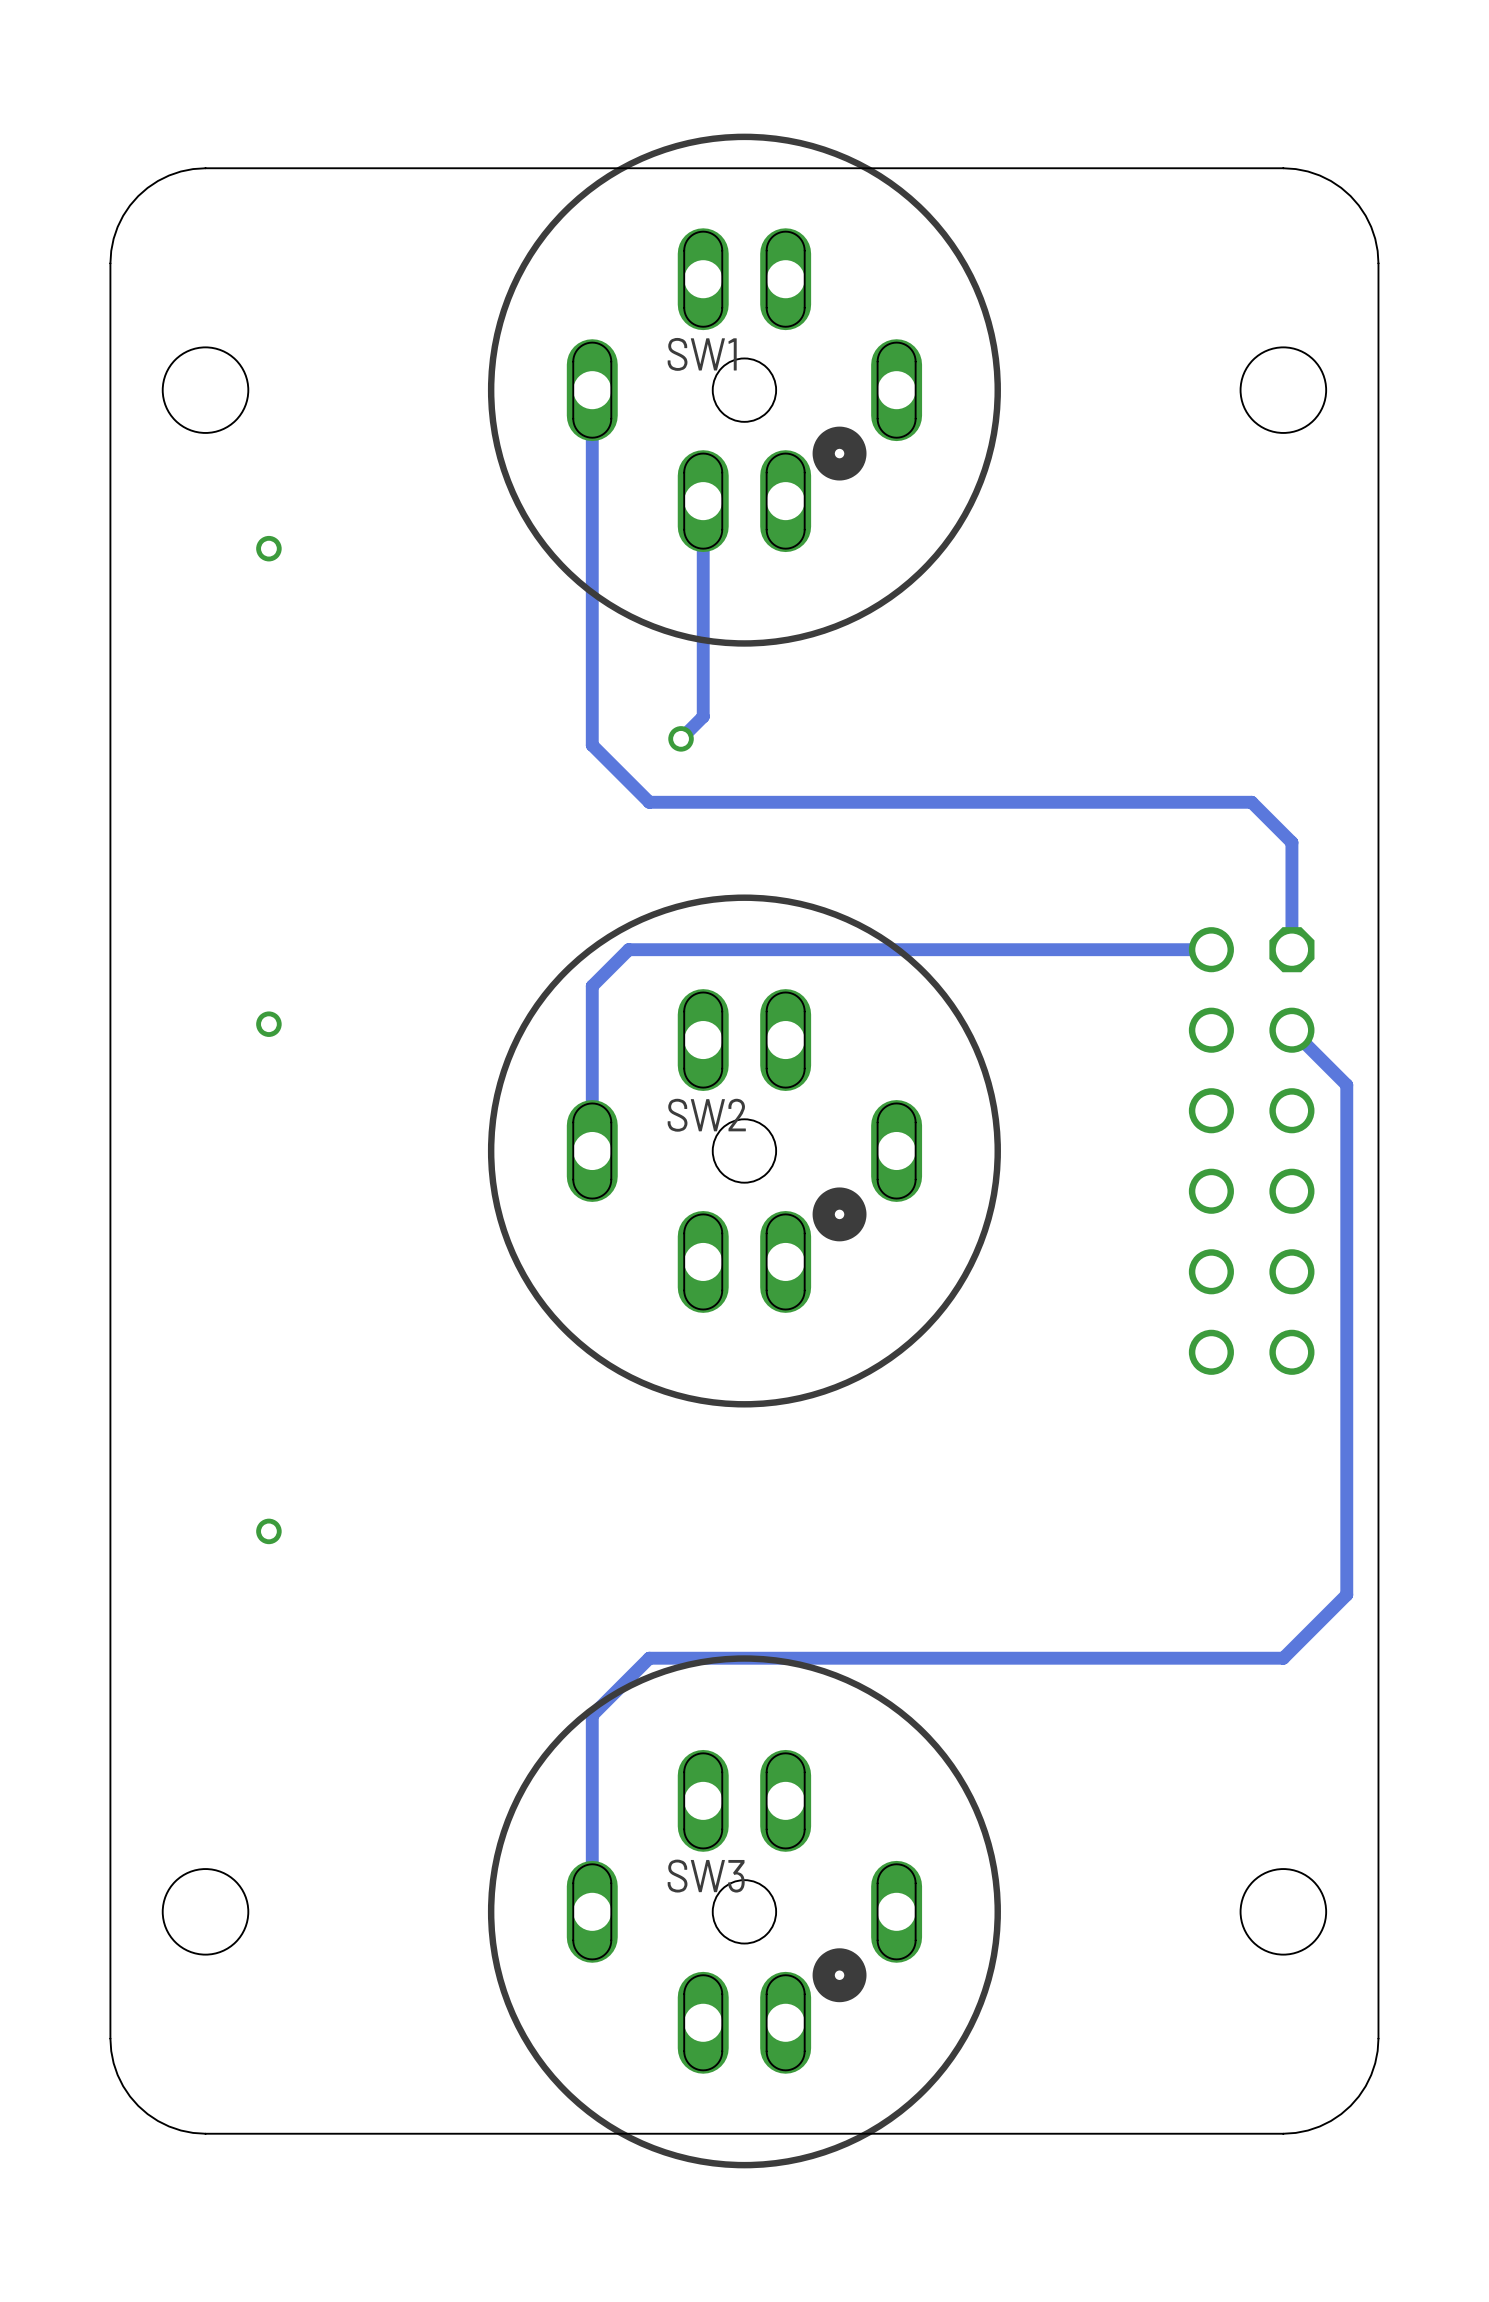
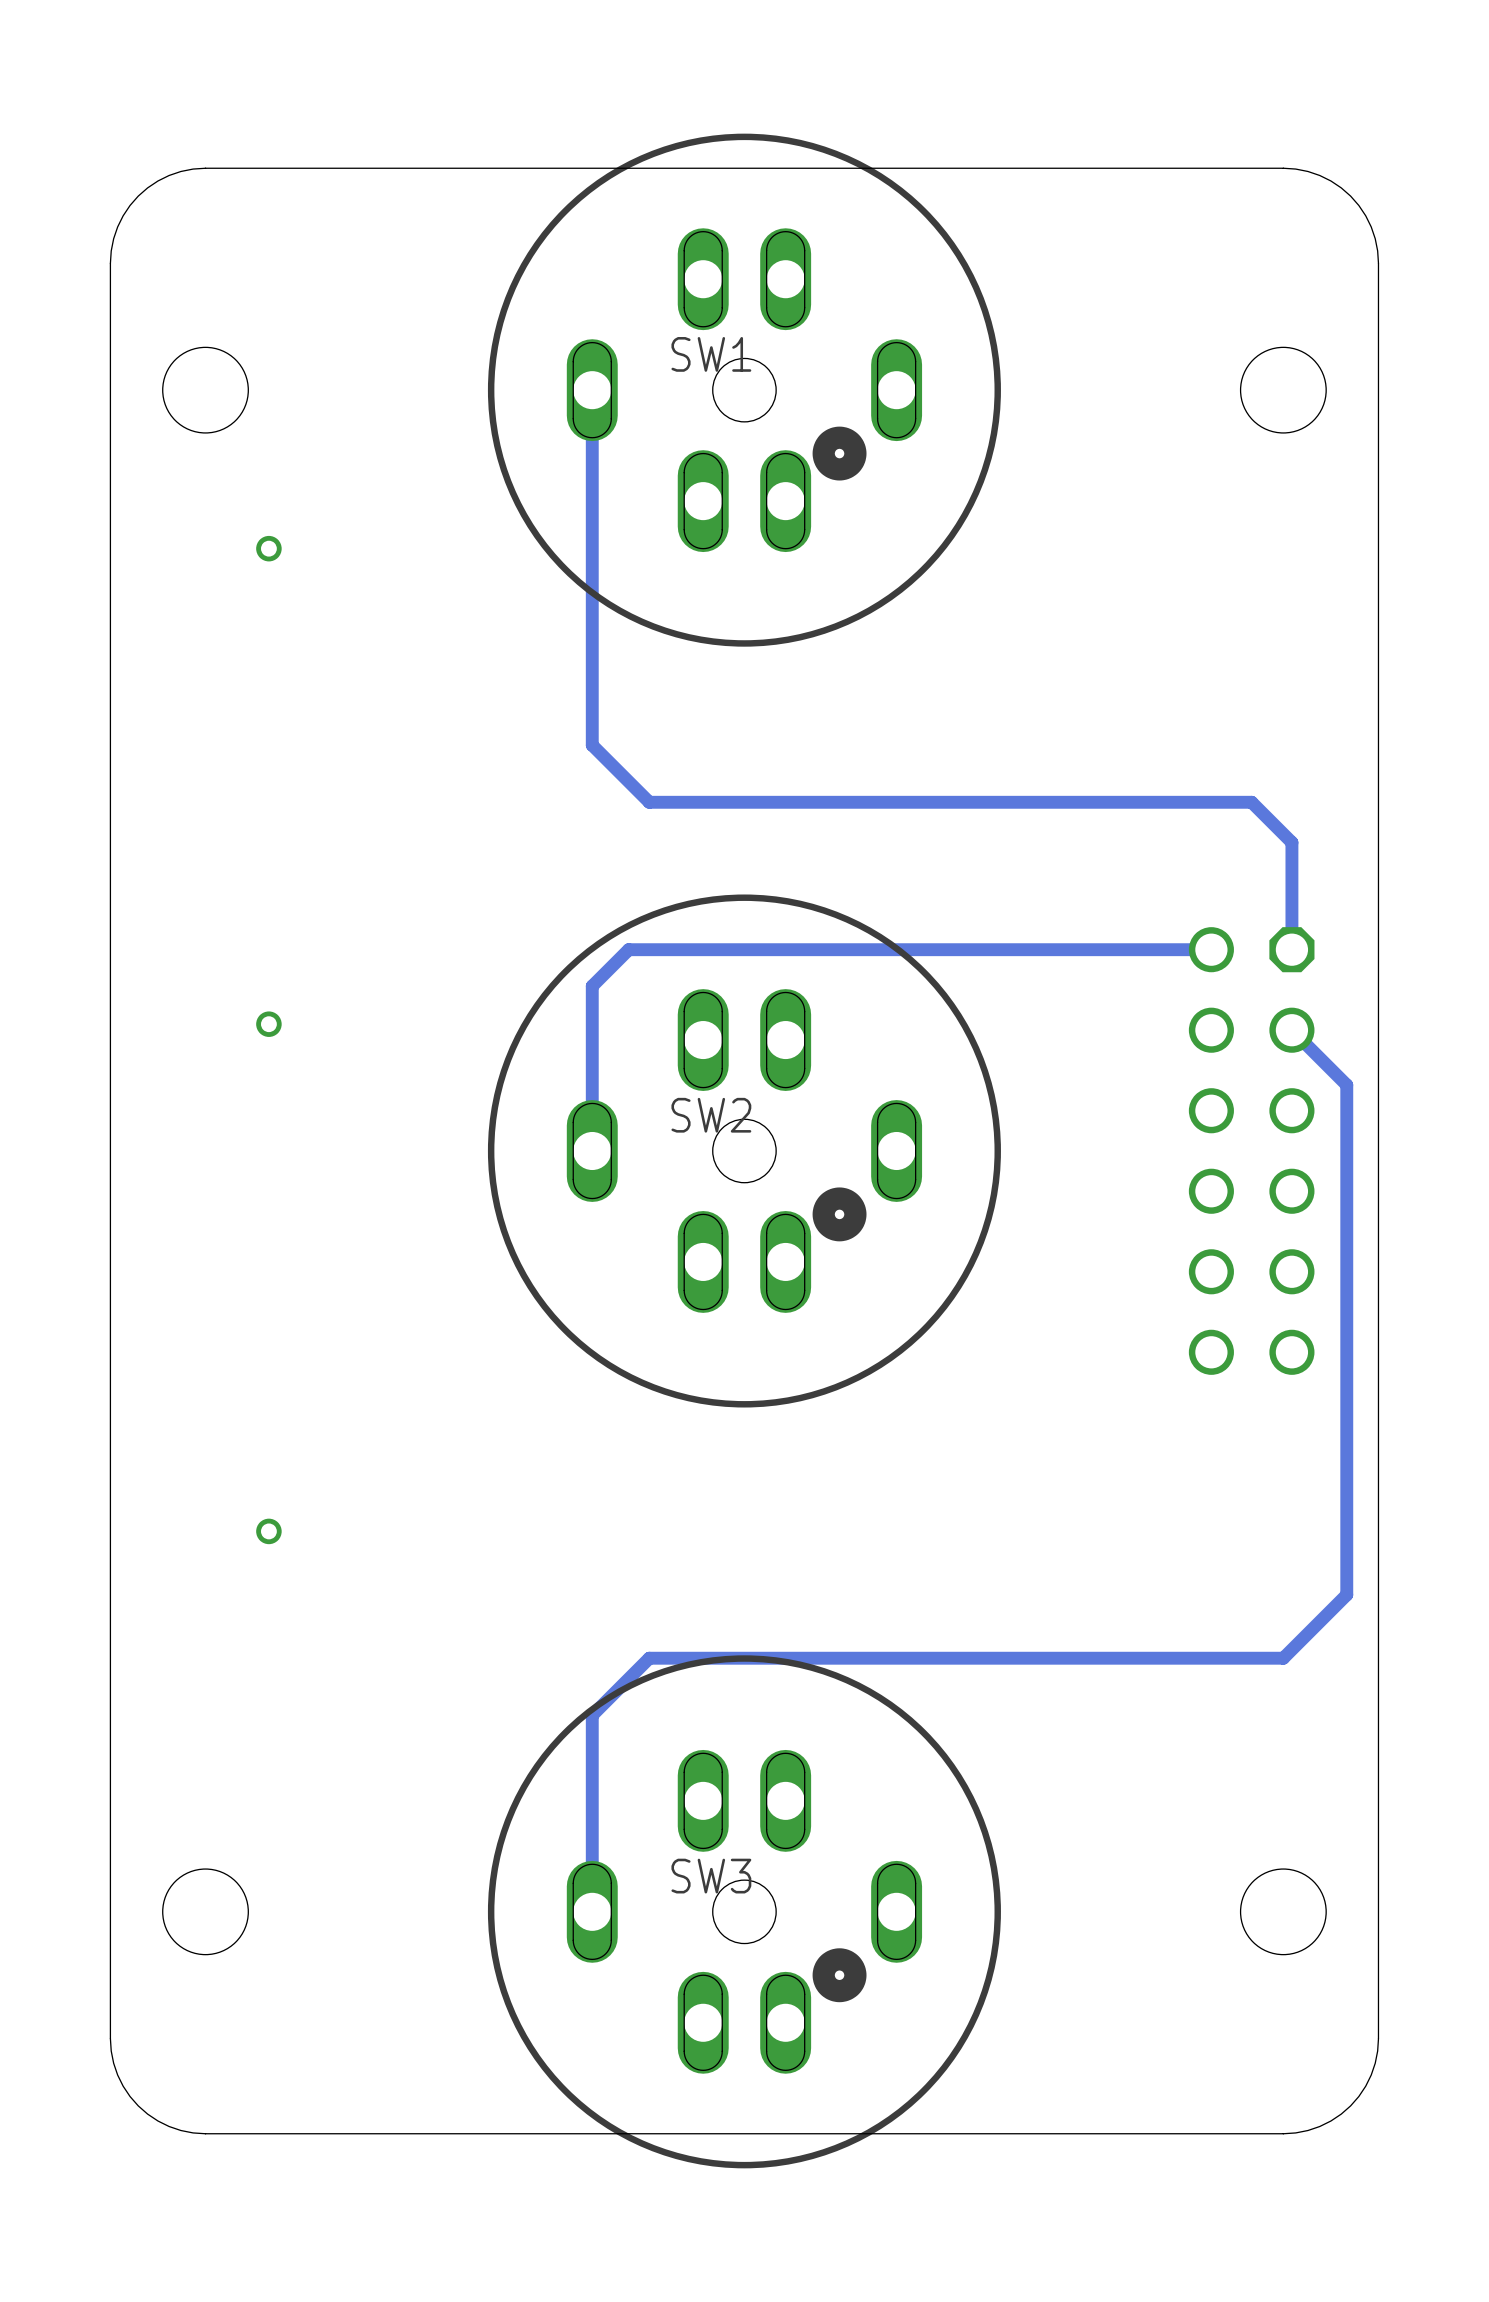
track: (703, 501) (703, 716) (681, 738) -> none
via: (681, 738) -> none

